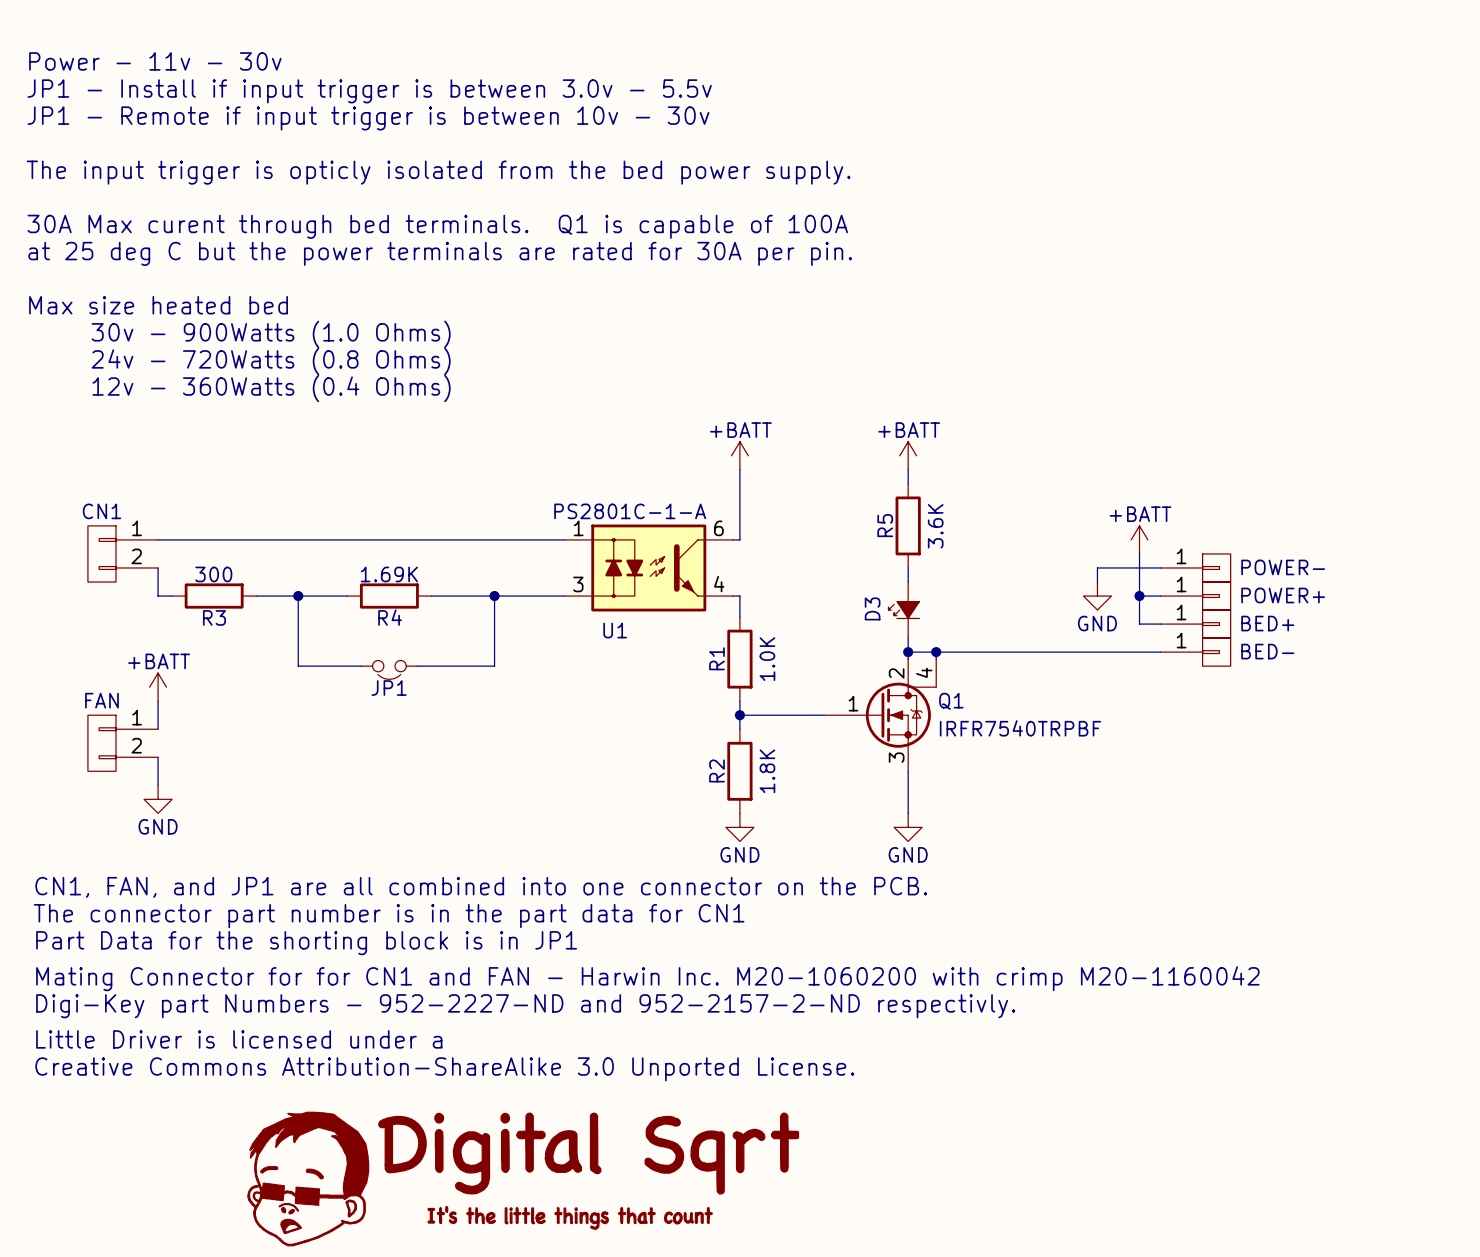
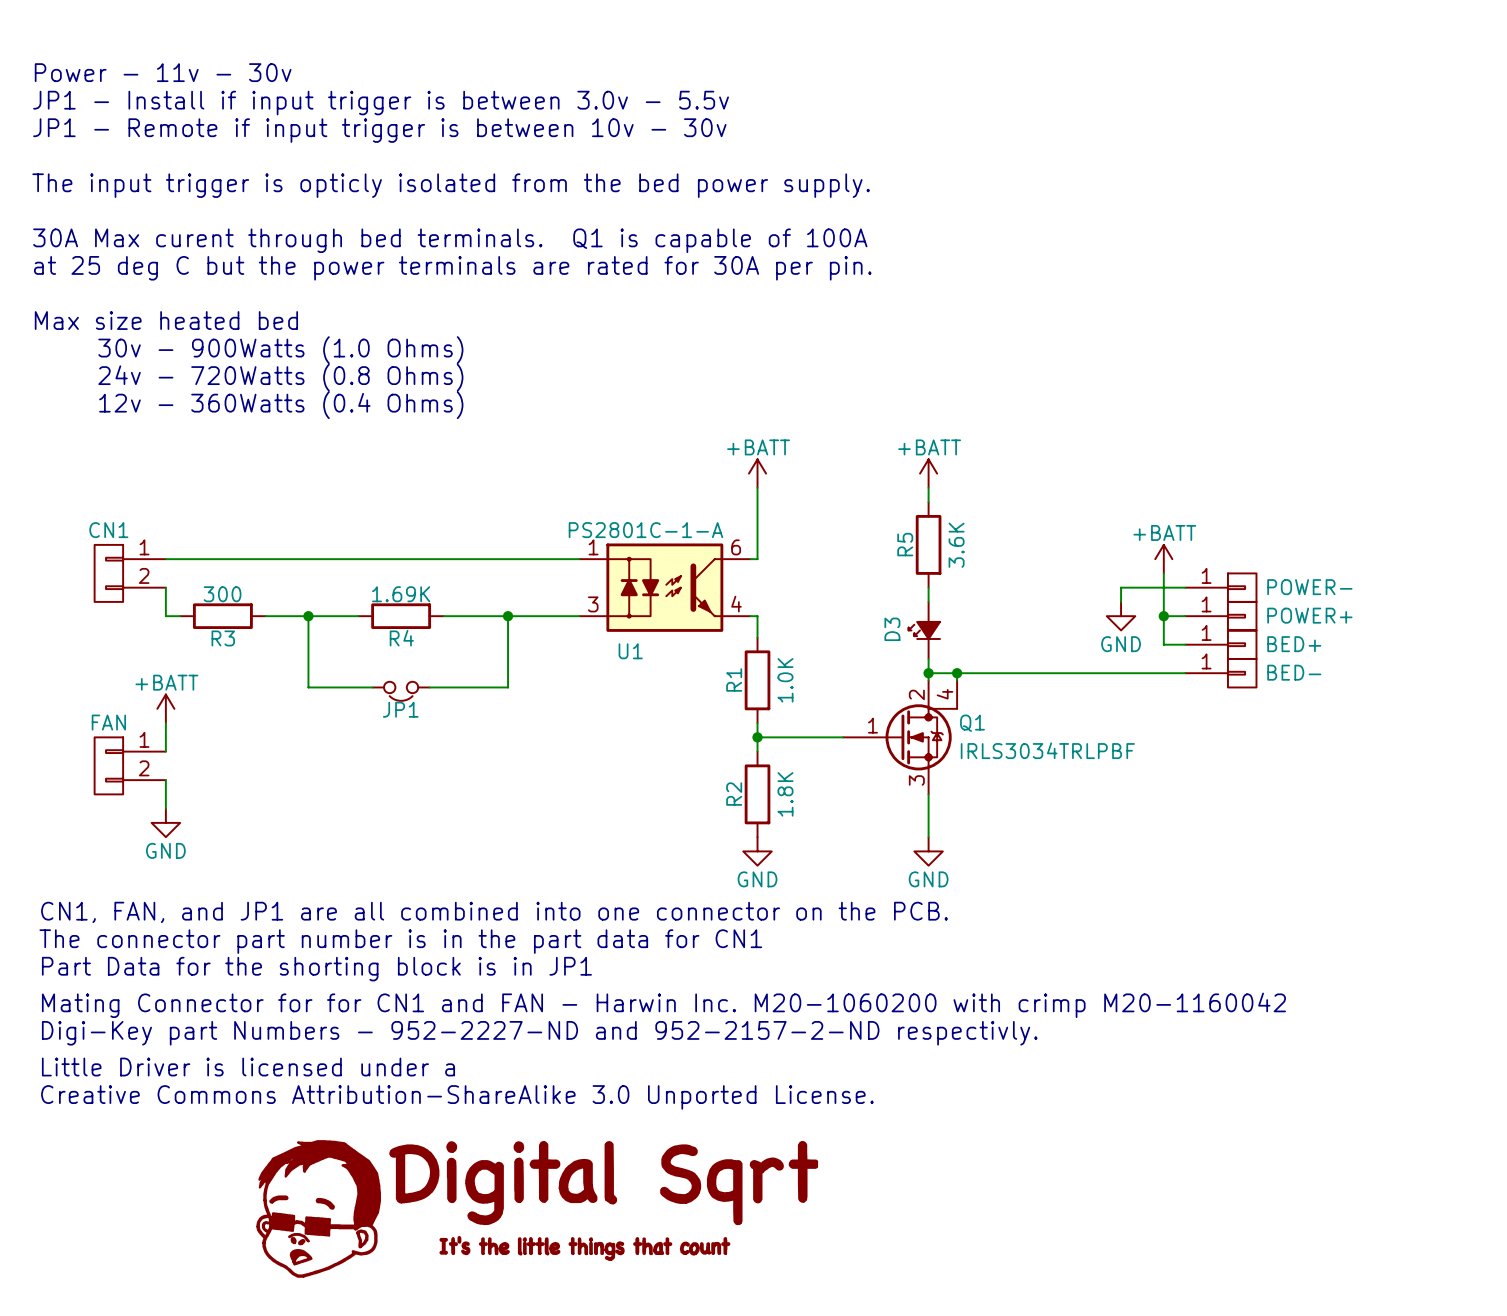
Q1 value: IRFR7540TRPBF (1020, 728) -> IRLS3034TRLPBF (1047, 750)

